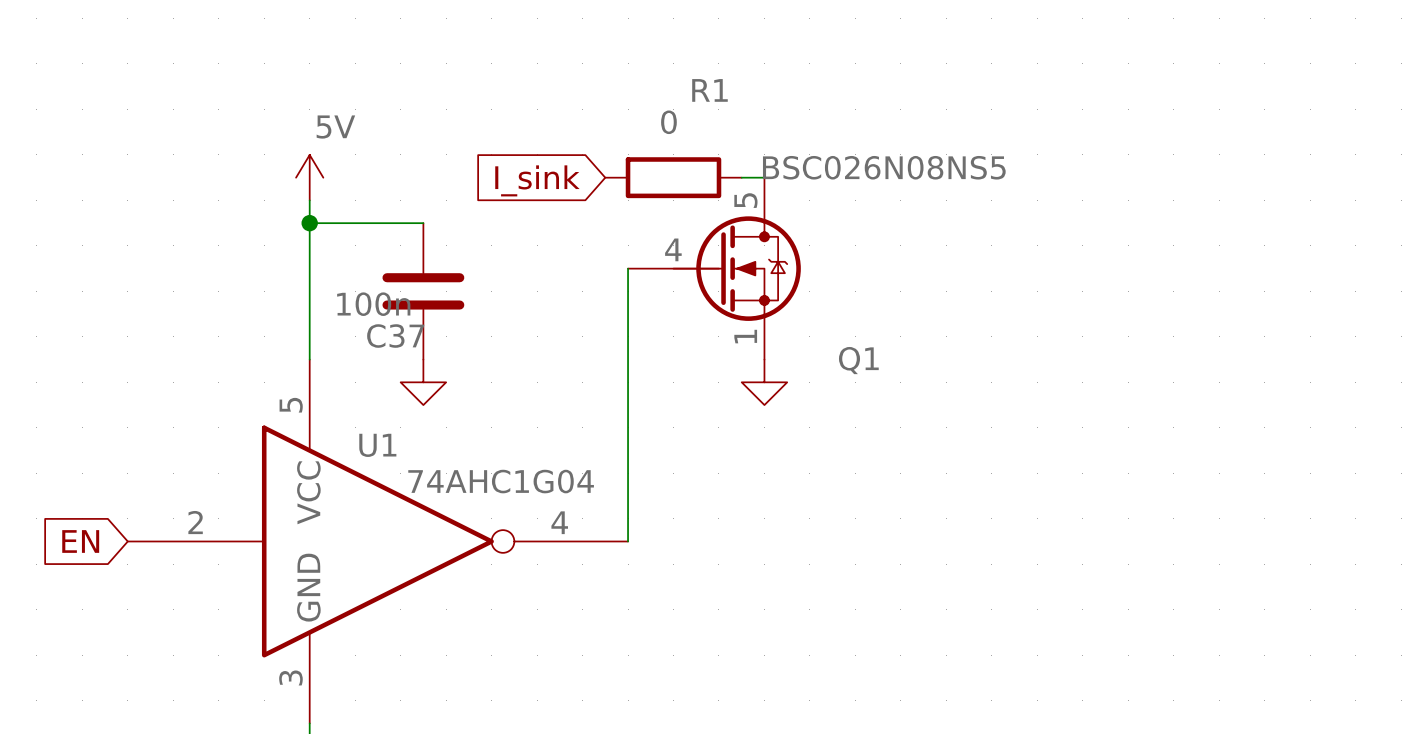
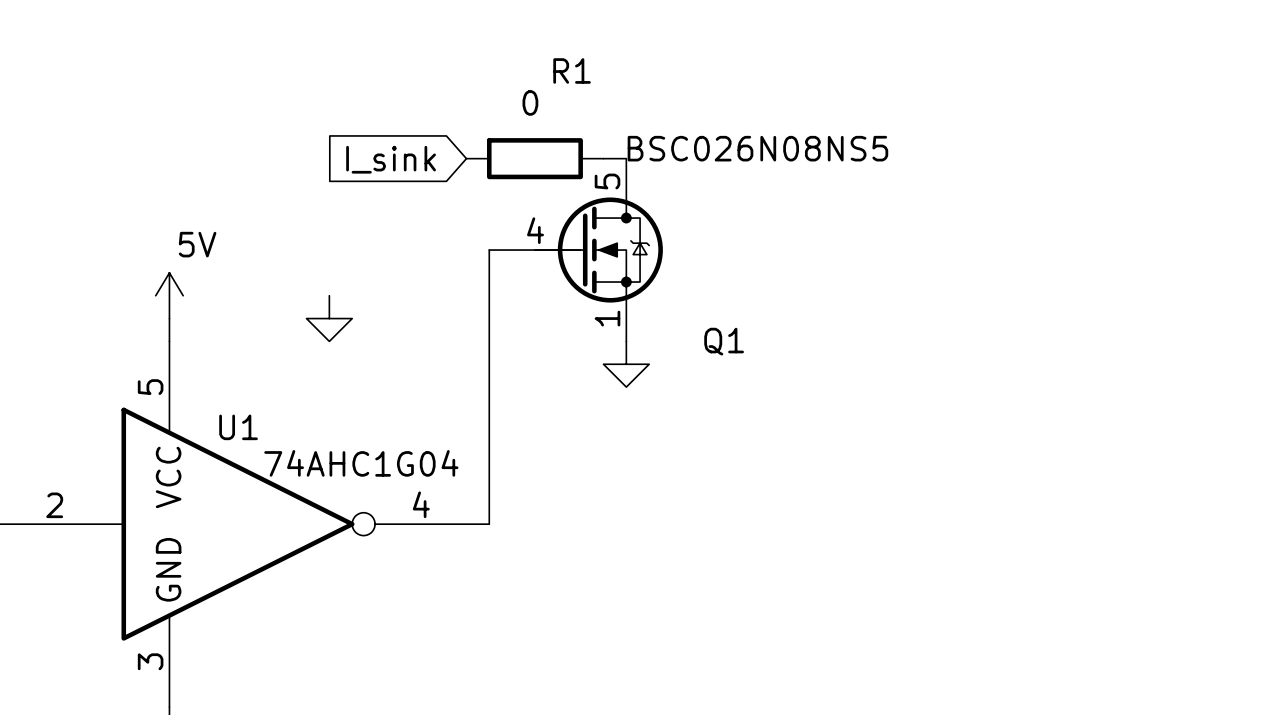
power symbol position: 5V (309, 177) -> 5V (169, 295)
wire: (309, 200) (309, 336) -> none
wire: (309, 223) (423, 223) -> none
junction: (309, 223) -> none
C37: 100n (423, 291) -> none
power symbol position: (423, 382) -> (329, 318)

